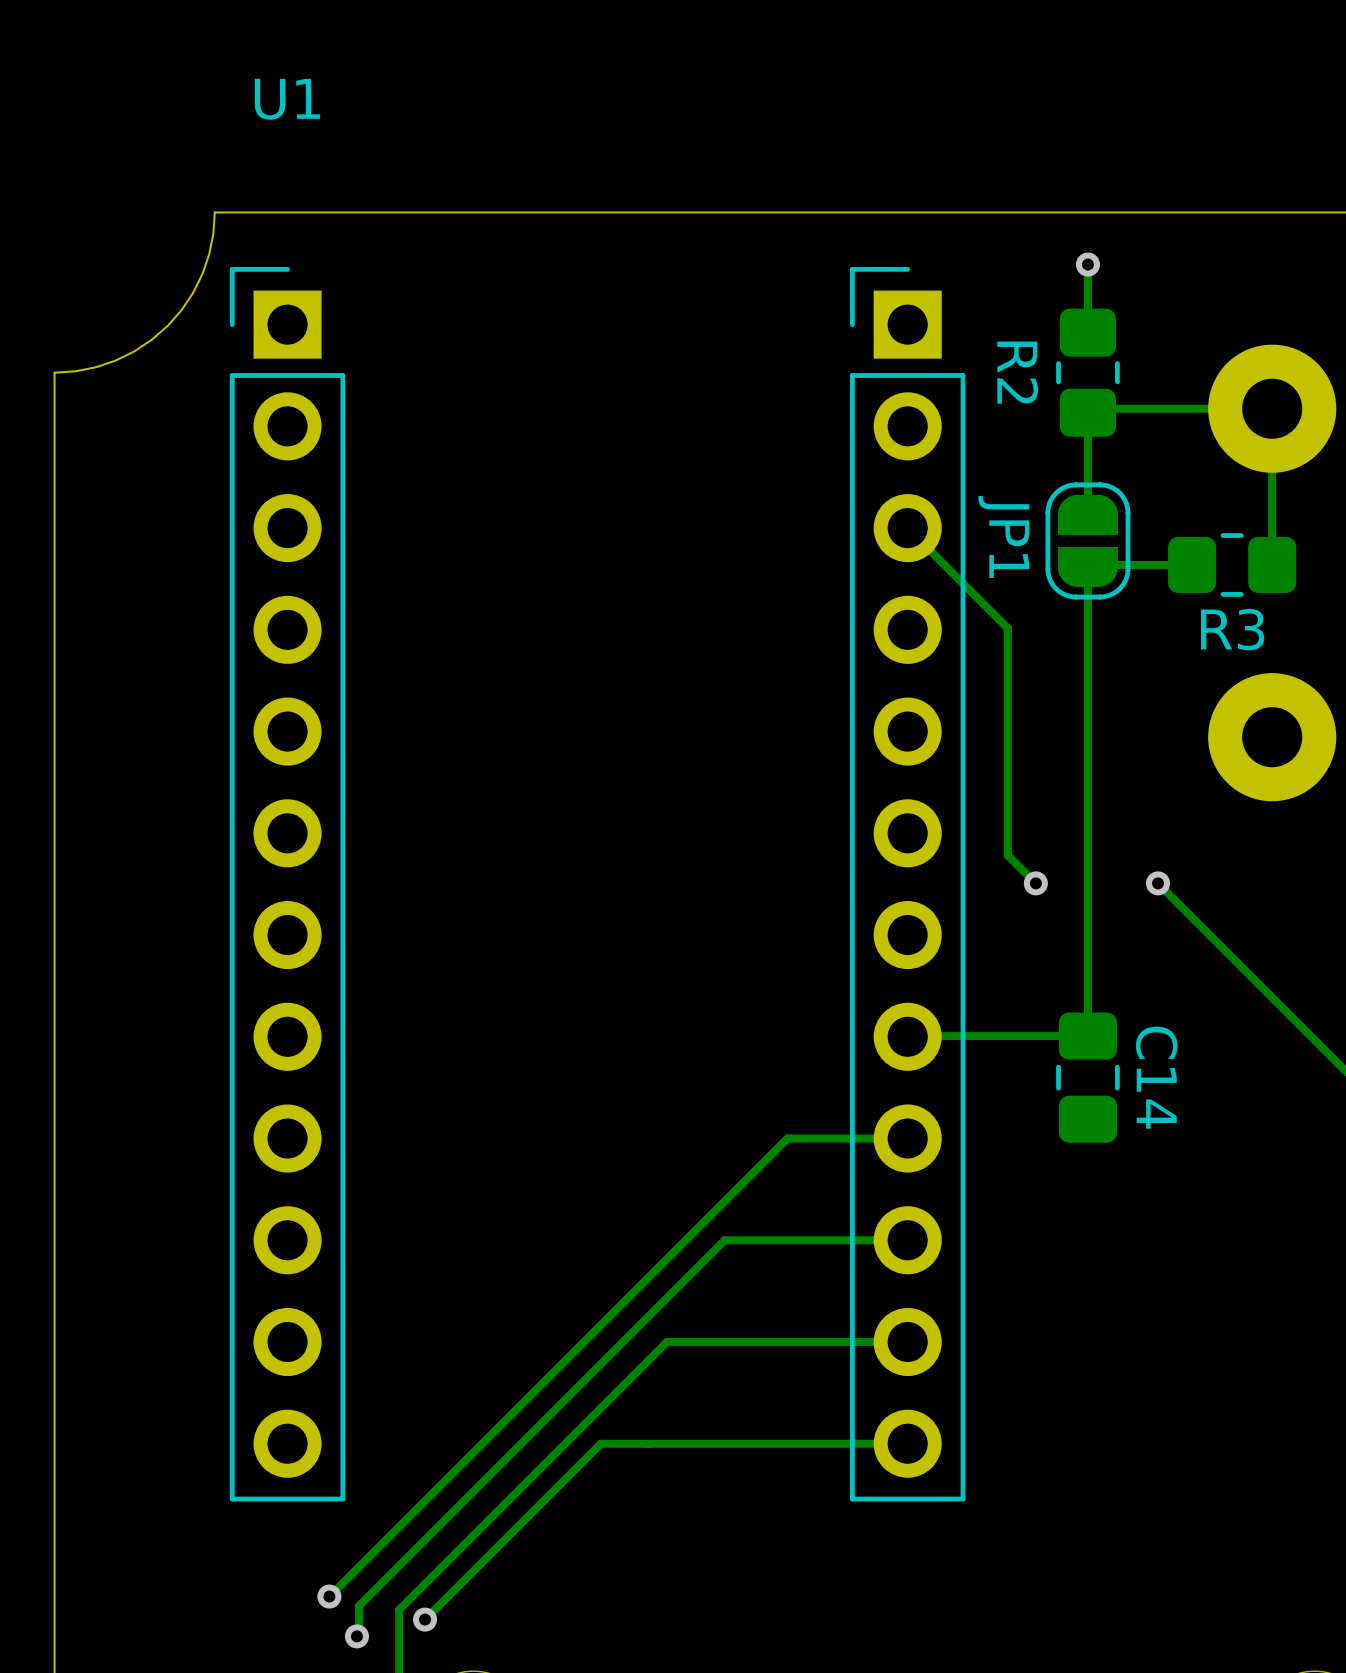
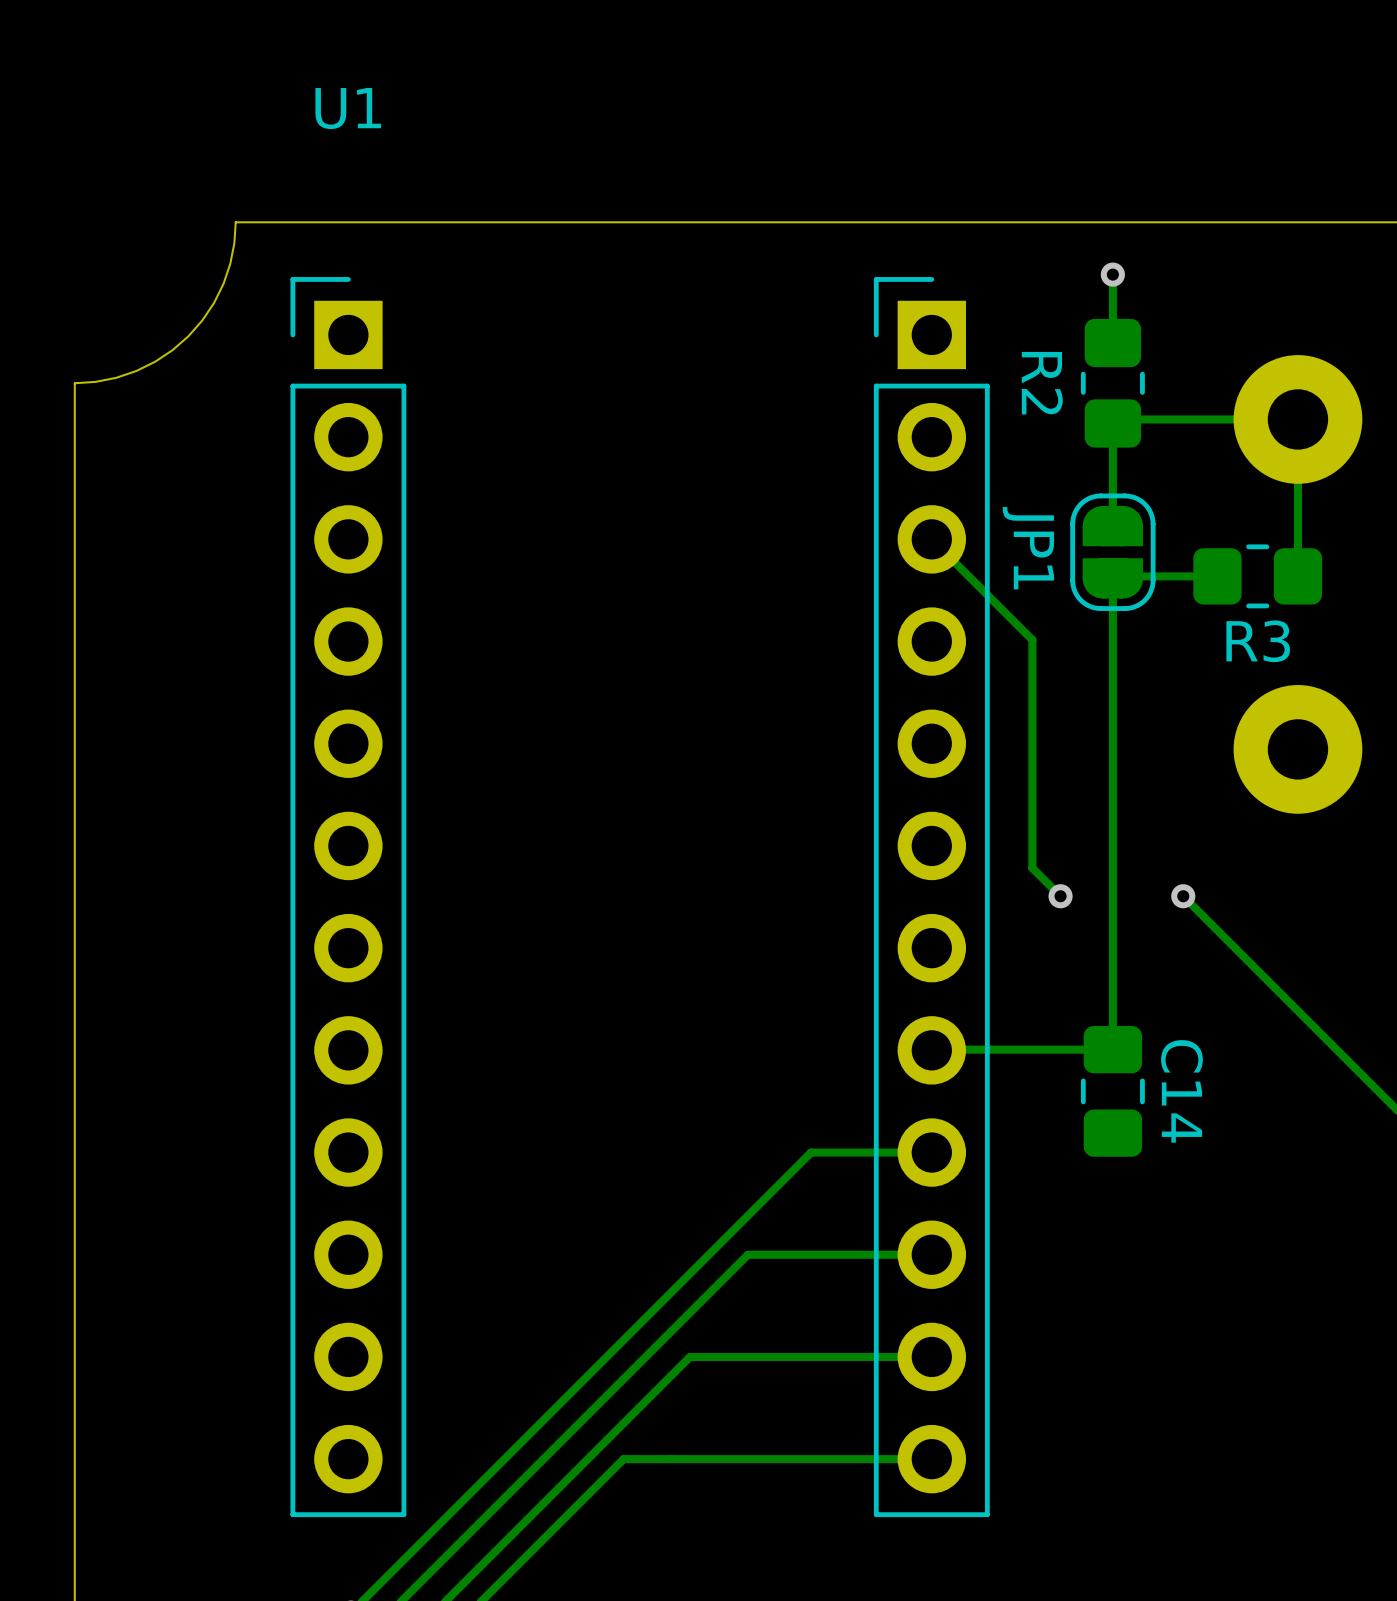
U1 name position: U1 (287, 99) -> U1 (348, 108)
U1 footprint: [229, 266, 966, 1502] -> [290, 277, 990, 1518]

